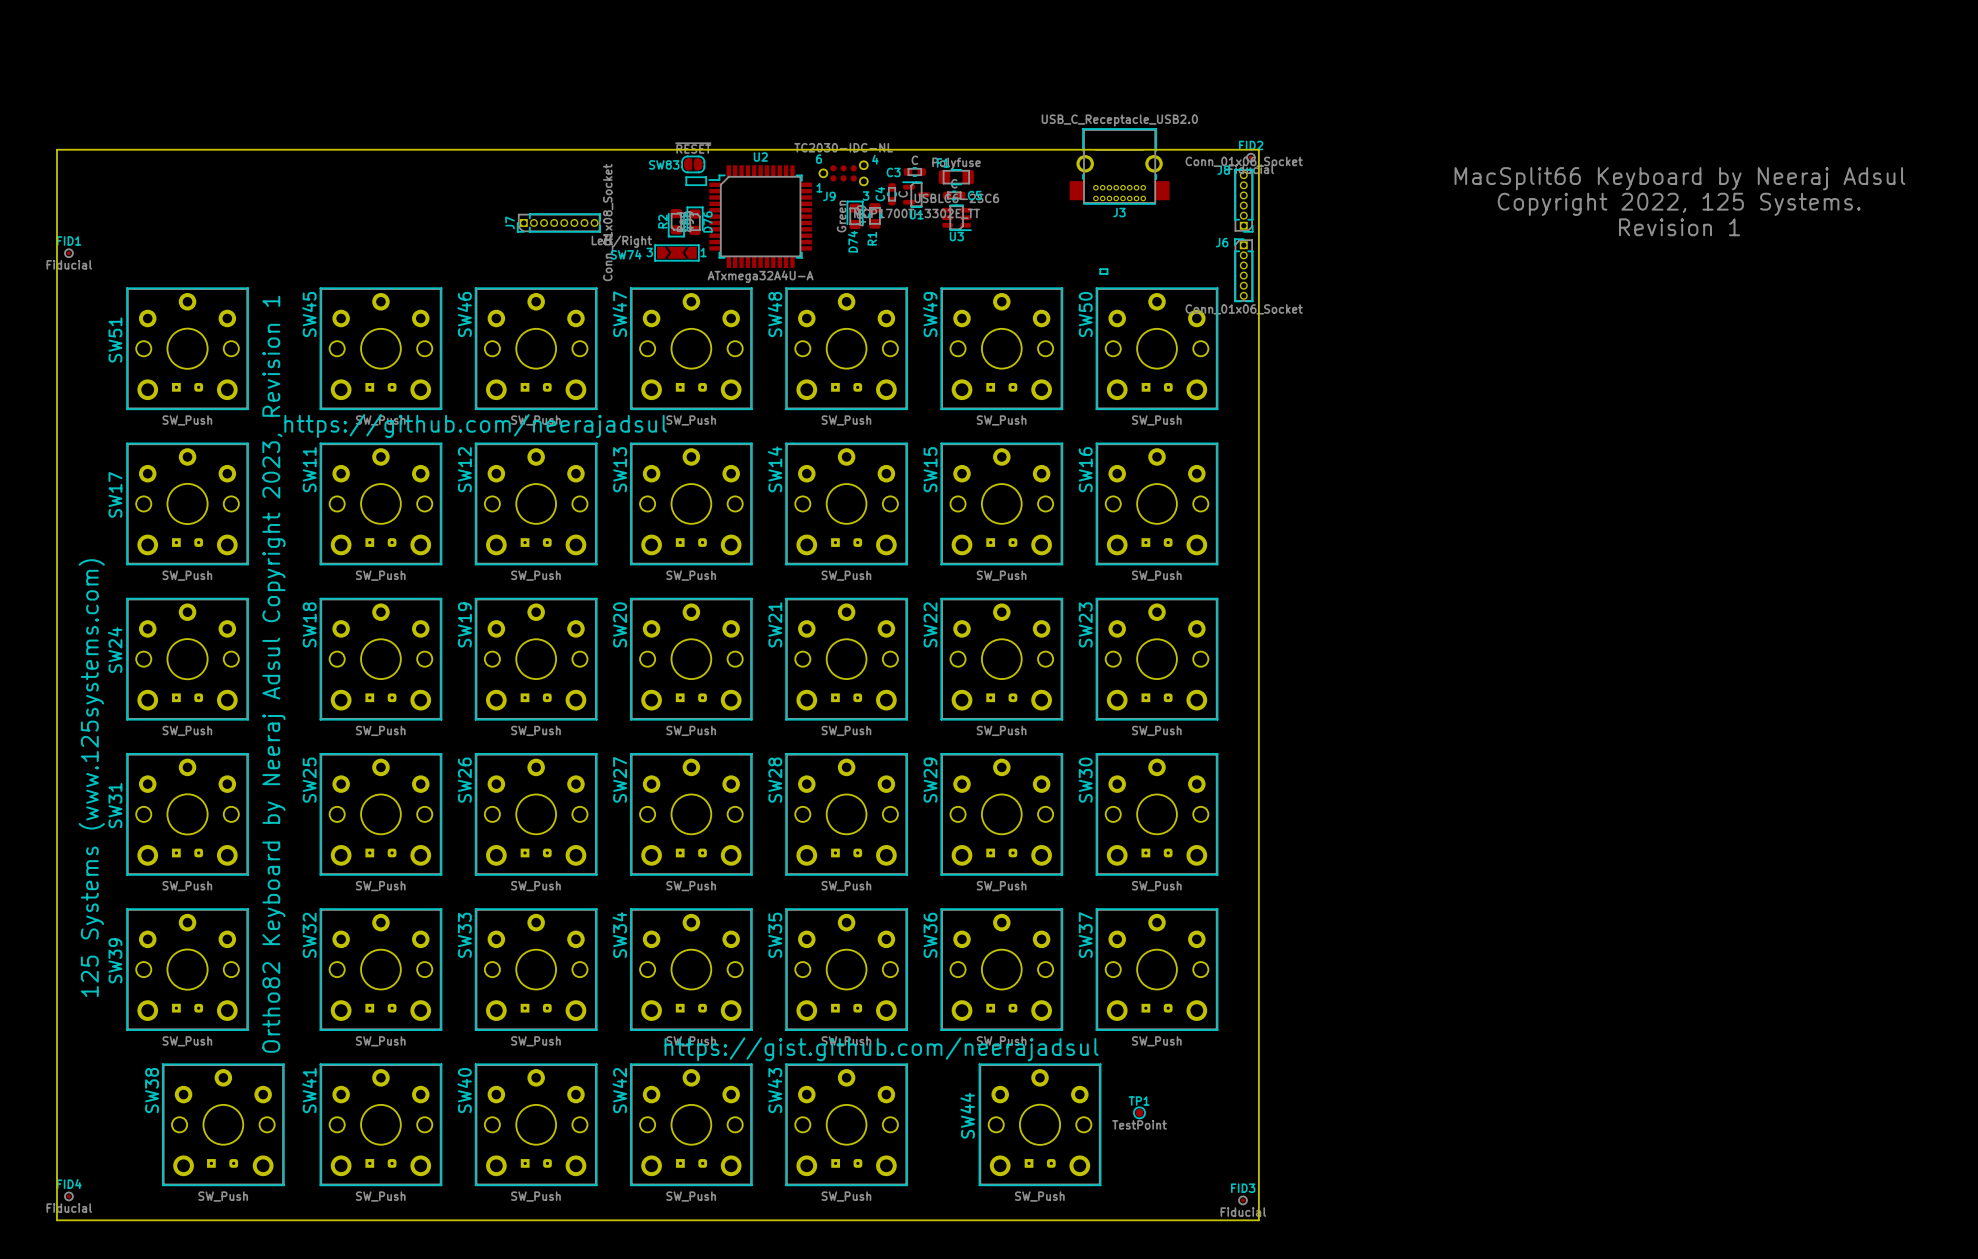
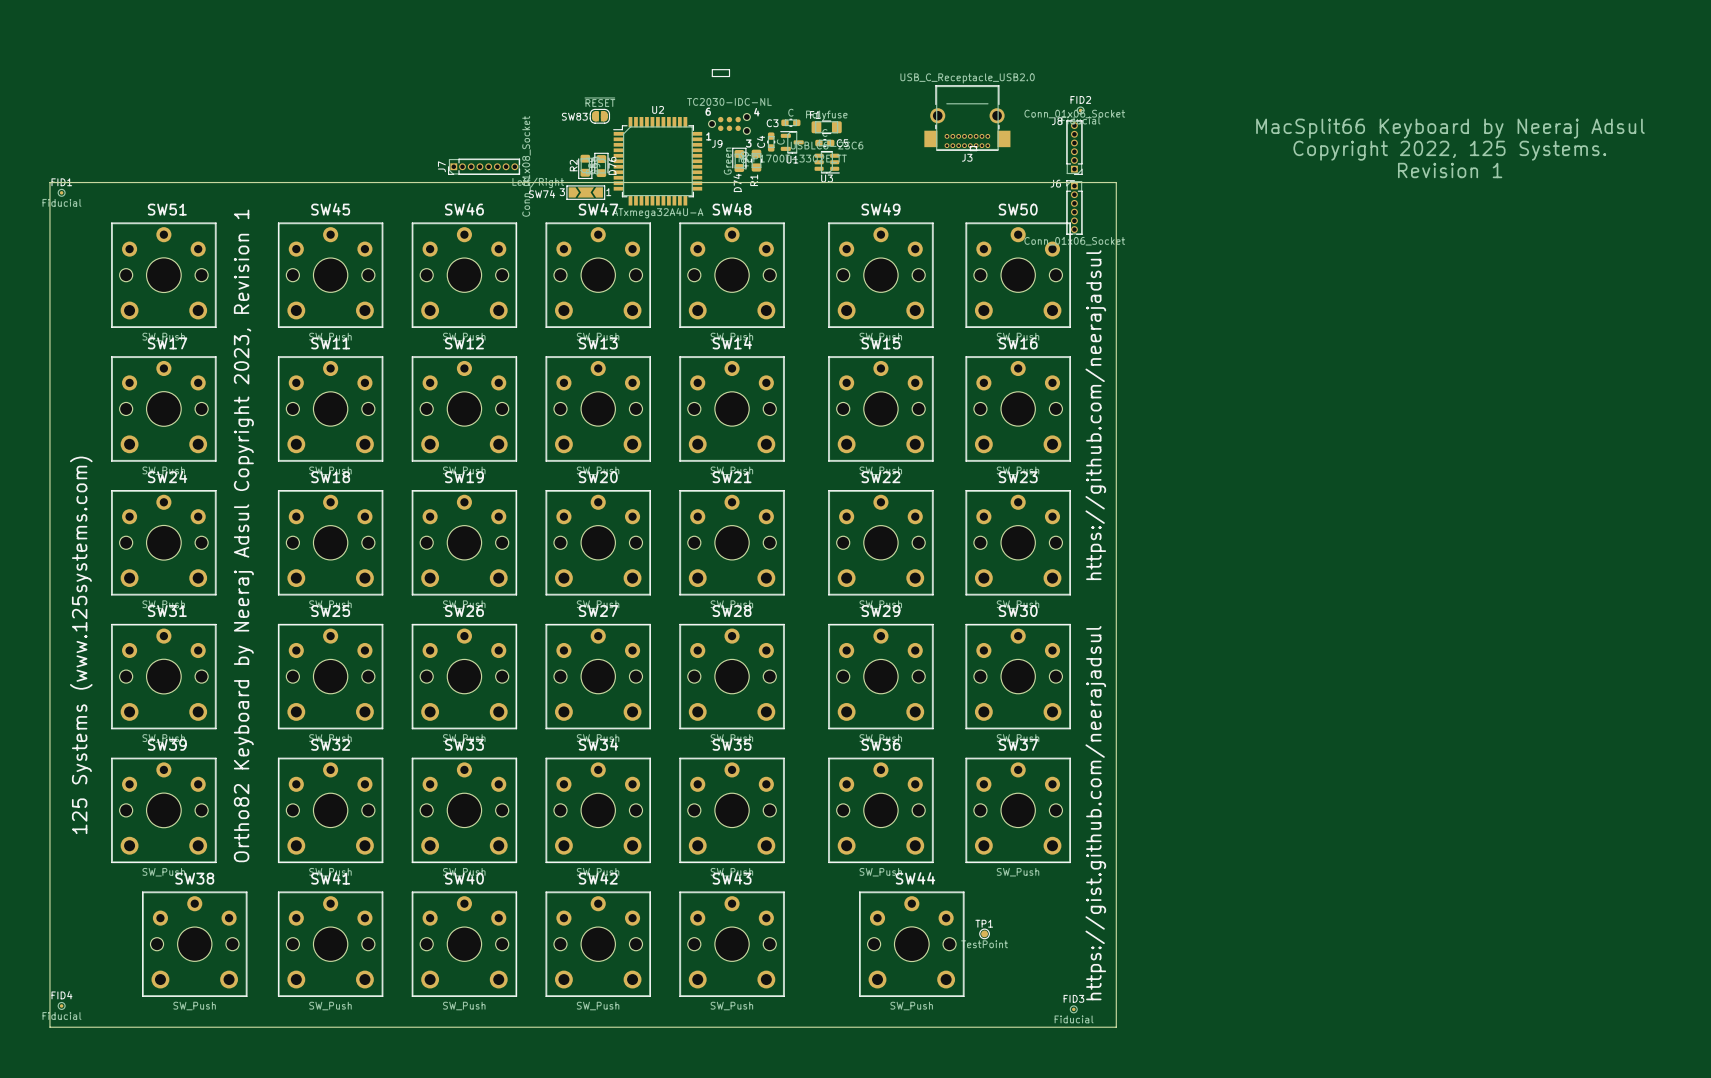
board edge: (56, 149) (1258, 149) (1258, 1220) (56, 1220) (56, 149) -> (49, 182) (49, 1027) (1116, 1027) (1116, 182) (49, 182)
line: (686, 177) (706, 177) (706, 185) (686, 185) (686, 177) -> (712, 69) (729, 69) (729, 76) (712, 76) (712, 69)
line: (1100, 269) (1107, 269) (1107, 273) (1100, 273) (1100, 269) -> (970, 146) (976, 146) (976, 150) (970, 150) (970, 146)
SW45 name rotation: 0° (309, 314) -> 90° clockwise (330, 209)
SW45 name position: SW45 (309, 314) -> SW45 (330, 209)
SW46 name rotation: 0° (464, 314) -> 90° clockwise (464, 209)
SW46 name position: SW46 (464, 314) -> SW46 (464, 209)
SW47 name rotation: 0° (619, 314) -> 90° clockwise (598, 209)
SW47 name position: SW47 (619, 314) -> SW47 (598, 209)
SW48 name rotation: 0° (775, 314) -> 90° clockwise (732, 209)
SW48 name position: SW48 (775, 314) -> SW48 (732, 209)
SW49 name rotation: 0° (930, 314) -> 90° clockwise (880, 209)
SW49 name position: SW49 (930, 314) -> SW49 (880, 209)
SW50 name rotation: 0° (1085, 314) -> 90° clockwise (1018, 209)
SW50 name position: SW50 (1085, 314) -> SW50 (1018, 209)
SW51 name rotation: 0° (115, 339) -> 90° clockwise (167, 209)
SW51 name position: SW51 (115, 339) -> SW51 (167, 209)
SW49 position: (1001, 348) -> (880, 275)
SW50 position: (1157, 348) -> (1018, 275)
part: (187, 387) -> none
part: (380, 387) -> none
part: (536, 387) -> none
part: (691, 387) -> none
part: (846, 387) -> none
part: (1001, 387) -> none
part: (1157, 387) -> none
text: https://github.com/neerajadsul (475, 426) -> none
SW11 name rotation: 0° (309, 469) -> 90° clockwise (330, 343)
SW11 name position: SW11 (309, 469) -> SW11 (330, 343)
SW12 name rotation: 0° (464, 469) -> 90° clockwise (464, 343)
SW12 name position: SW12 (464, 469) -> SW12 (464, 343)
SW13 name rotation: 0° (620, 469) -> 90° clockwise (598, 343)
SW13 name position: SW13 (620, 469) -> SW13 (598, 343)
SW14 name rotation: 0° (775, 469) -> 90° clockwise (732, 343)
SW14 name position: SW14 (775, 469) -> SW14 (732, 343)
SW15 name rotation: 0° (930, 469) -> 90° clockwise (880, 343)
SW15 name position: SW15 (930, 469) -> SW15 (880, 343)
SW16 name rotation: 0° (1085, 469) -> 90° clockwise (1018, 343)
SW16 name position: SW16 (1085, 469) -> SW16 (1018, 343)
SW17 name rotation: 0° (115, 494) -> 90° clockwise (167, 343)
SW17 name position: SW17 (115, 494) -> SW17 (167, 343)
SW15 position: (1001, 503) -> (880, 408)
SW16 position: (1157, 503) -> (1018, 408)
text: none -> https://github.com/neerajadsul (1095, 415)
part: (187, 542) -> none
part: (380, 542) -> none
part: (536, 542) -> none
part: (691, 542) -> none
part: (846, 542) -> none
part: (1001, 542) -> none
part: (1157, 542) -> none
SW18 name rotation: 0° (309, 624) -> 90° clockwise (330, 477)
SW18 name position: SW18 (309, 624) -> SW18 (330, 477)
SW19 name rotation: 0° (464, 624) -> 90° clockwise (464, 477)
SW19 name position: SW19 (464, 624) -> SW19 (464, 477)
SW20 name rotation: 0° (620, 624) -> 90° clockwise (598, 477)
SW20 name position: SW20 (620, 624) -> SW20 (598, 477)
SW21 name rotation: 0° (775, 624) -> 90° clockwise (732, 477)
SW21 name position: SW21 (775, 624) -> SW21 (732, 477)
SW22 name rotation: 0° (930, 624) -> 90° clockwise (880, 477)
SW22 name position: SW22 (930, 624) -> SW22 (880, 477)
SW23 name rotation: 0° (1085, 624) -> 90° clockwise (1018, 477)
SW23 name position: SW23 (1085, 624) -> SW23 (1018, 477)
SW24 name rotation: 0° (115, 650) -> 90° clockwise (167, 476)
SW24 name position: SW24 (115, 650) -> SW24 (167, 476)
SW22 position: (1001, 659) -> (880, 542)
SW23 position: (1157, 659) -> (1018, 542)
text position: Ortho82 Keyboard by Neeraj Adsul Copyright 2023, Revision 1 (273, 674) -> Ortho82 Keyboard by Neeraj Adsul Copyright 2023, Revision 1 (243, 535)
part: (187, 697) -> none
part: (380, 697) -> none
part: (536, 697) -> none
part: (691, 697) -> none
part: (846, 697) -> none
part: (1001, 697) -> none
part: (1157, 697) -> none
SW27 name rotation: 0° (620, 779) -> 90° clockwise (598, 611)
SW27 name position: SW27 (620, 779) -> SW27 (598, 611)
SW25 name rotation: 0° (309, 780) -> 90° clockwise (330, 611)
SW25 name position: SW25 (309, 780) -> SW25 (330, 611)
SW26 name rotation: 0° (464, 780) -> 90° clockwise (464, 611)
SW26 name position: SW26 (464, 780) -> SW26 (464, 611)
SW28 name rotation: 0° (775, 780) -> 90° clockwise (732, 611)
SW28 name position: SW28 (775, 780) -> SW28 (732, 611)
SW29 name rotation: 0° (930, 780) -> 90° clockwise (880, 611)
SW29 name position: SW29 (930, 780) -> SW29 (880, 611)
SW30 name rotation: 0° (1085, 780) -> 90° clockwise (1018, 611)
SW30 name position: SW30 (1085, 780) -> SW30 (1018, 611)
SW31 name rotation: 0° (115, 805) -> 90° clockwise (167, 611)
SW31 name position: SW31 (115, 805) -> SW31 (167, 611)
SW29 position: (1001, 814) -> (880, 676)
SW30 position: (1157, 814) -> (1018, 676)
part: (187, 852) -> none
part: (380, 852) -> none
part: (536, 852) -> none
part: (691, 852) -> none
part: (846, 852) -> none
part: (1001, 852) -> none
part: (1157, 852) -> none
SW32 name rotation: 0° (309, 935) -> 90° clockwise (330, 744)
SW32 name position: SW32 (309, 935) -> SW32 (330, 744)
SW33 name rotation: 0° (464, 935) -> 90° clockwise (464, 744)
SW33 name position: SW33 (464, 935) -> SW33 (464, 744)
SW34 name rotation: 0° (619, 935) -> 90° clockwise (598, 744)
SW34 name position: SW34 (619, 935) -> SW34 (598, 744)
SW35 name rotation: 0° (775, 935) -> 90° clockwise (732, 744)
SW35 name position: SW35 (775, 935) -> SW35 (732, 744)
SW36 name rotation: 0° (930, 935) -> 90° clockwise (880, 744)
SW36 name position: SW36 (930, 935) -> SW36 (880, 744)
SW37 name rotation: 0° (1085, 935) -> 90° clockwise (1018, 744)
SW37 name position: SW37 (1085, 935) -> SW37 (1018, 744)
SW39 name rotation: 0° (115, 960) -> 90° clockwise (167, 744)
SW39 name position: SW39 (115, 960) -> SW39 (167, 744)
SW36 position: (1001, 969) -> (880, 810)
SW37 position: (1157, 969) -> (1018, 810)
text: none -> https://gist.github.com/neerajadsul (1095, 813)
part: (187, 1008) -> none
part: (380, 1008) -> none
part: (536, 1008) -> none
part: (691, 1008) -> none
part: (846, 1008) -> none
part: (1001, 1008) -> none
part: (1157, 1008) -> none
text: https://gist.github.com/neerajadsul (881, 1049) -> none
SW38 name rotation: 0° (152, 1090) -> 90° clockwise (194, 878)
SW38 name position: SW38 (152, 1090) -> SW38 (194, 878)
SW41 name rotation: 0° (309, 1090) -> 90° clockwise (330, 878)
SW41 name position: SW41 (309, 1090) -> SW41 (330, 878)
SW40 name rotation: 0° (464, 1090) -> 90° clockwise (464, 878)
SW40 name position: SW40 (464, 1090) -> SW40 (464, 878)
SW42 name rotation: 0° (619, 1090) -> 90° clockwise (598, 878)
SW42 name position: SW42 (619, 1090) -> SW42 (598, 878)
SW43 name rotation: 0° (775, 1090) -> 90° clockwise (732, 878)
SW43 name position: SW43 (775, 1090) -> SW43 (732, 878)
SW44 name rotation: 0° (967, 1115) -> 90° clockwise (915, 878)
SW44 name position: SW44 (967, 1115) -> SW44 (915, 878)
SW44 position: (1040, 1124) -> (911, 944)
part: (222, 1163) -> none
part: (380, 1163) -> none
part: (536, 1163) -> none
part: (691, 1163) -> none
part: (846, 1163) -> none
part: (1040, 1163) -> none

